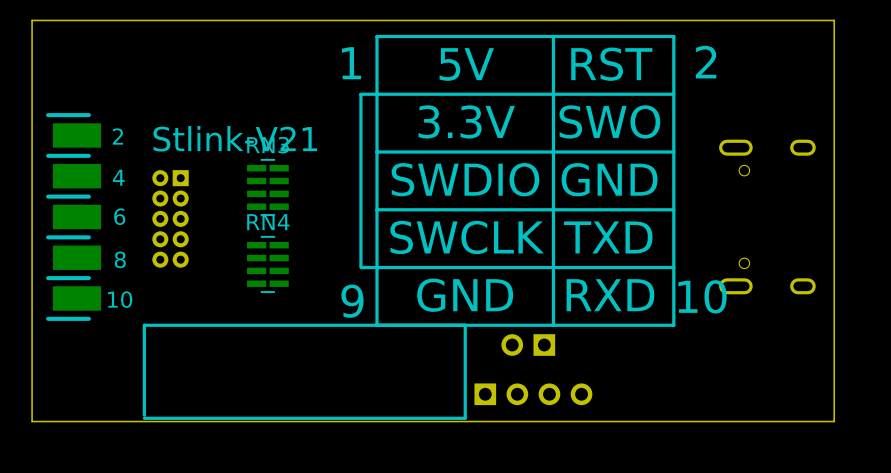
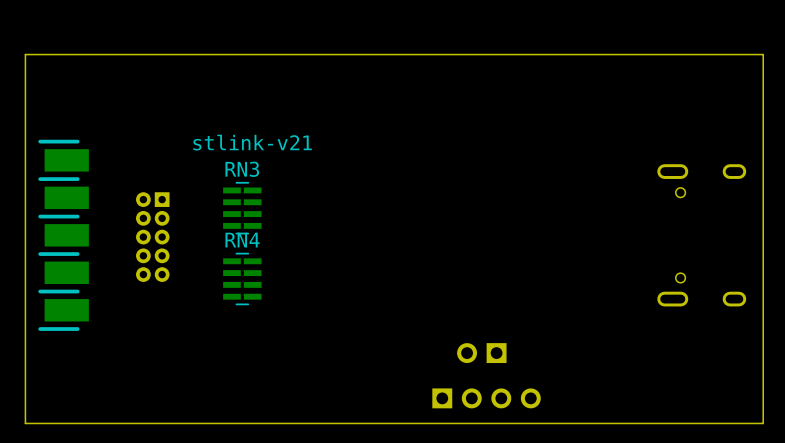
line: (553, 36) (553, 325) -> none
text: 2 (706, 62) -> none
text: 1 (351, 63) -> none
text: 5V (466, 64) -> none
text: RST (611, 64) -> none
line: (360, 94) (360, 266) -> none
line: (673, 94) (360, 94) -> none
text: 3.3V (466, 121) -> none
text: SWO (609, 121) -> none
text: 2 (117, 136) -> none
text: Stlink-V21 (235, 138) -> stlink-v21 (252, 142)
line: (673, 152) (376, 152) -> none
text: 4 (118, 177) -> none
text: SWDIO (465, 179) -> none
text: GND (609, 179) -> none
line: (673, 209) (376, 209) -> none
text: 6 (119, 216) -> none
text: SWCLK (467, 237) -> none
text: TXD (608, 237) -> none
text: 8 (120, 259) -> none
line: (673, 267) (360, 267) -> none
text: GND (465, 295) -> none
text: RXD (610, 295) -> none
text: 10 (702, 296) -> none
text: 10 (120, 299) -> none
text: 9 (352, 301) -> none
line: (376, 325) (376, 36) (673, 36) (673, 325) (144, 325) (144, 415) -> none
line: (465, 325) (465, 418) -> none
line: (464, 418) (144, 418) -> none

